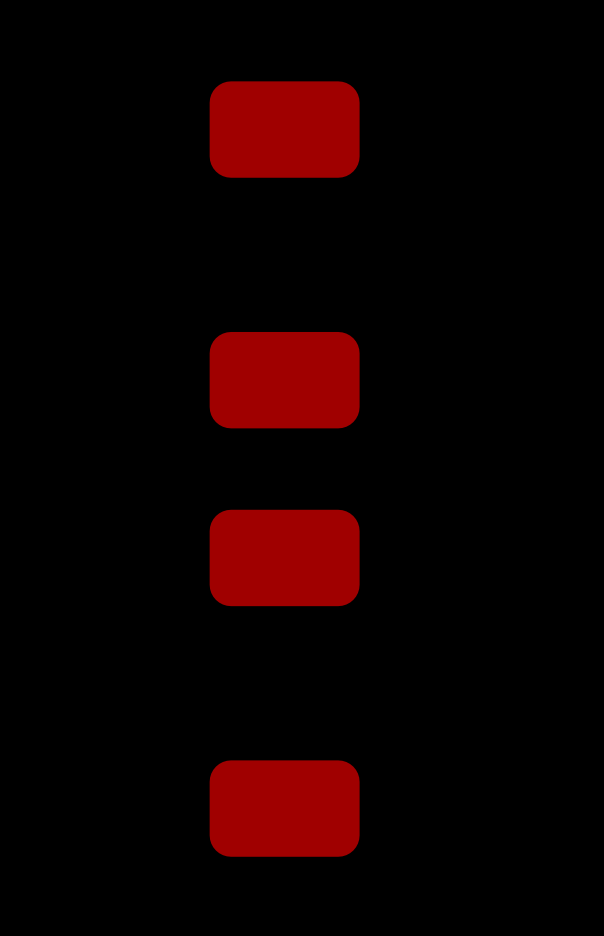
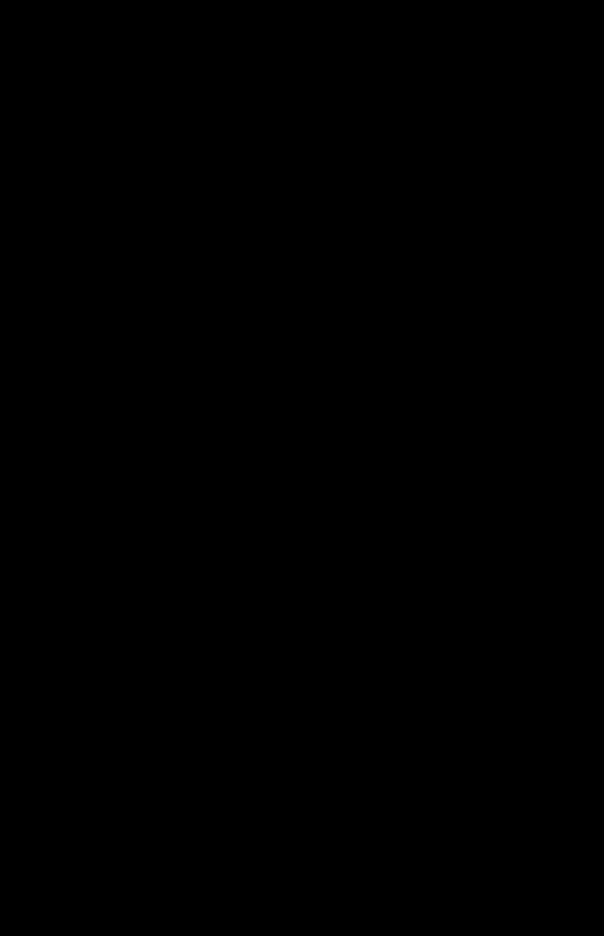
part: (284, 254) -> none
part: (284, 683) -> none

